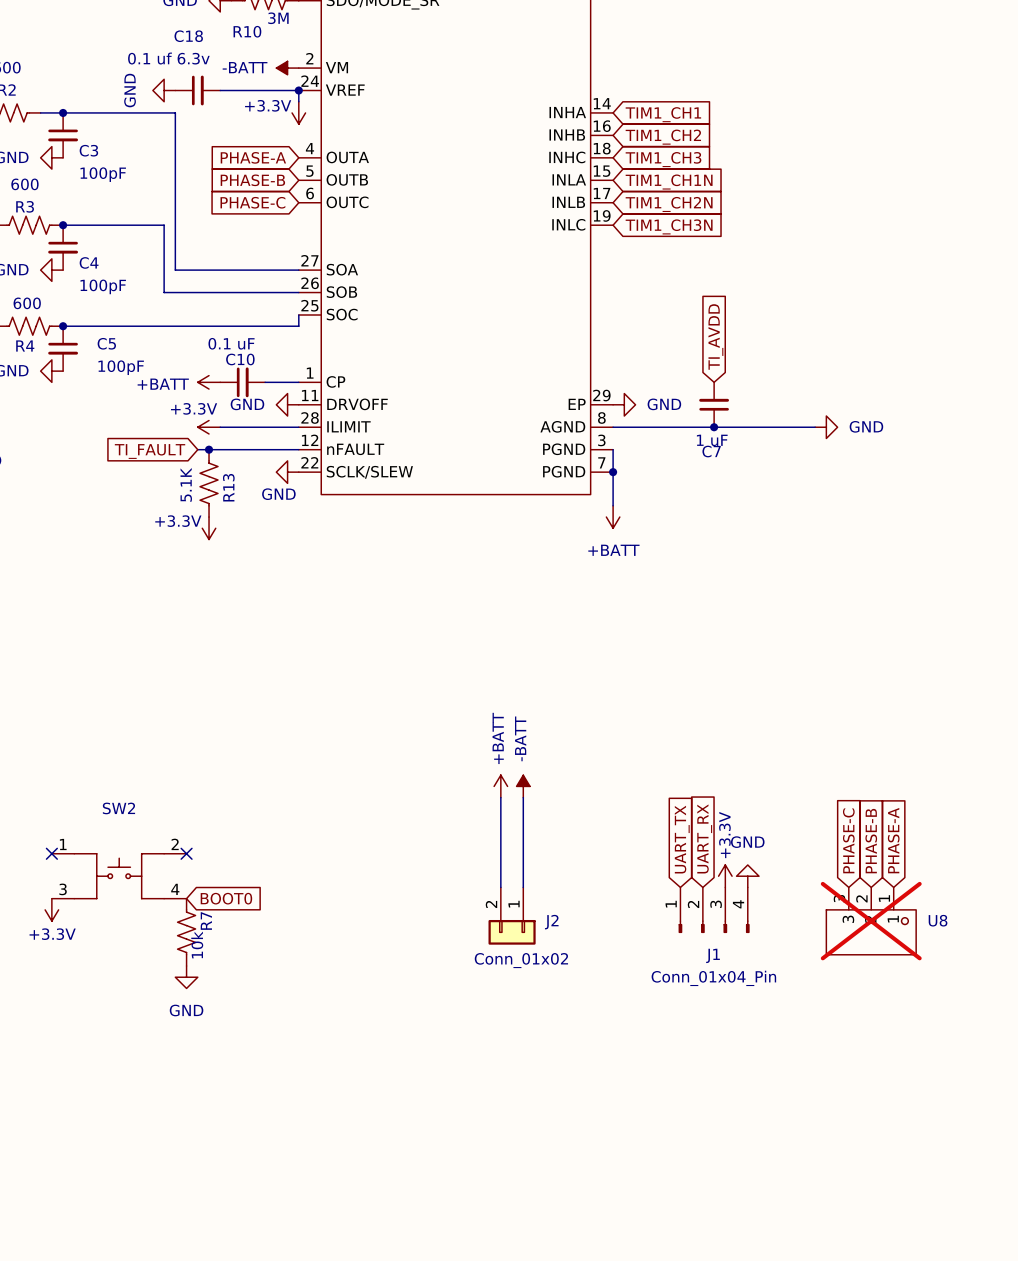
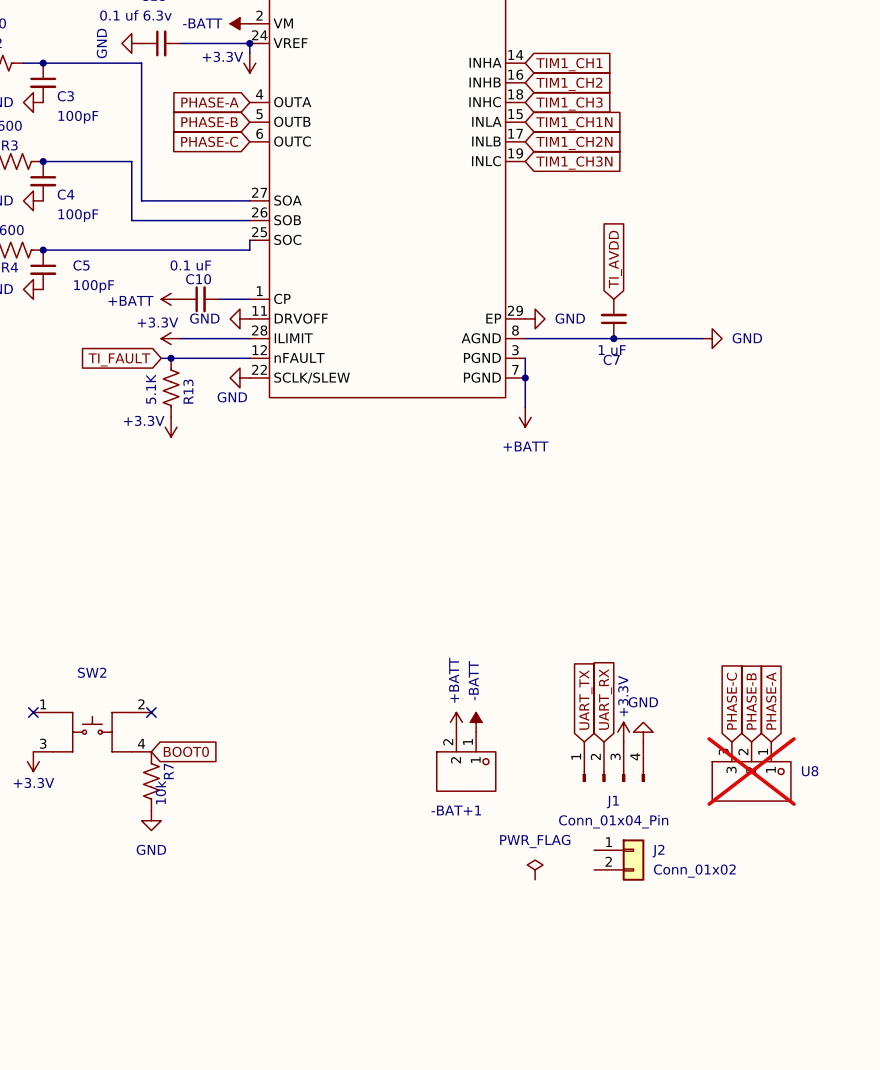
power symbol position: +BATT (500, 786) -> +BATT (456, 722)
power symbol position: -BATT (523, 786) -> -BATT (476, 722)
wire: (500, 797) (500, 887) -> none
wire: (523, 797) (523, 887) -> none
-BAT+1: none -> (466, 761)
J2 position: (512, 916) -> (619, 860)
J2 rotation: 0° (512, 932) -> 90° counterclockwise (633, 860)
J2 value position: Conn_01x02 (521, 960) -> Conn_01x02 (694, 871)
power symbol: none -> PWR_FLAG (535, 869)

